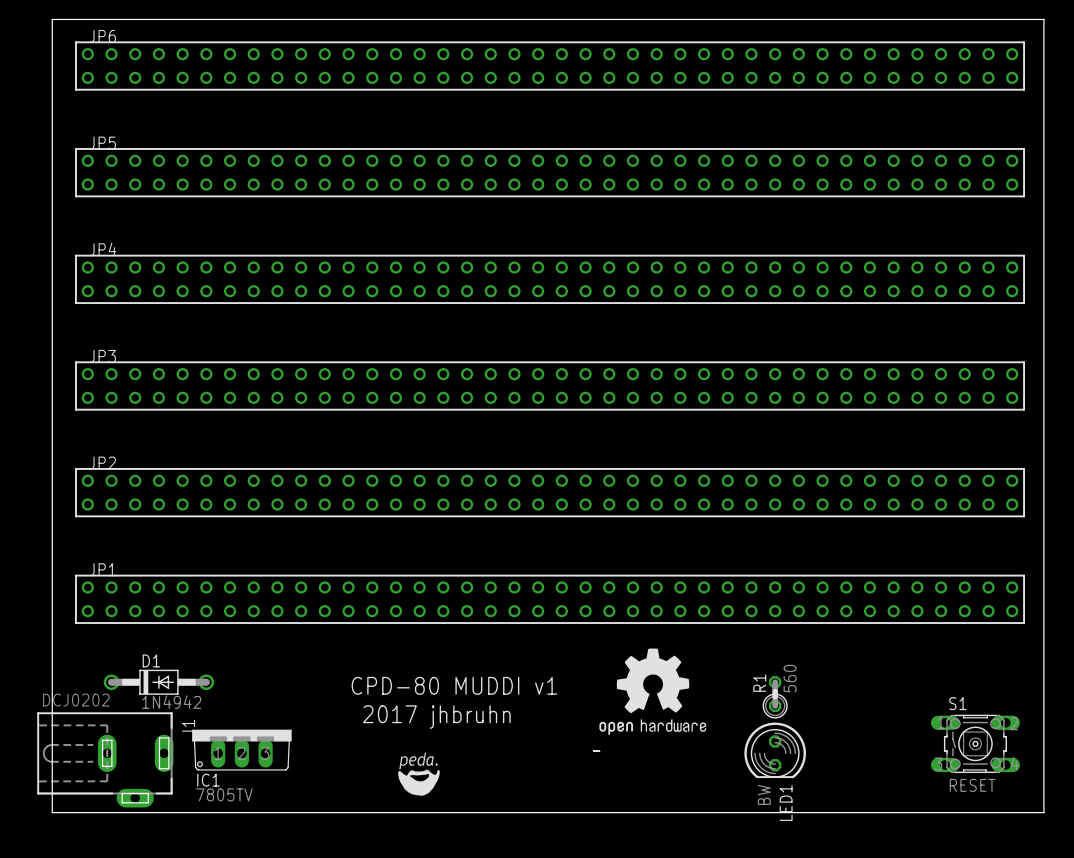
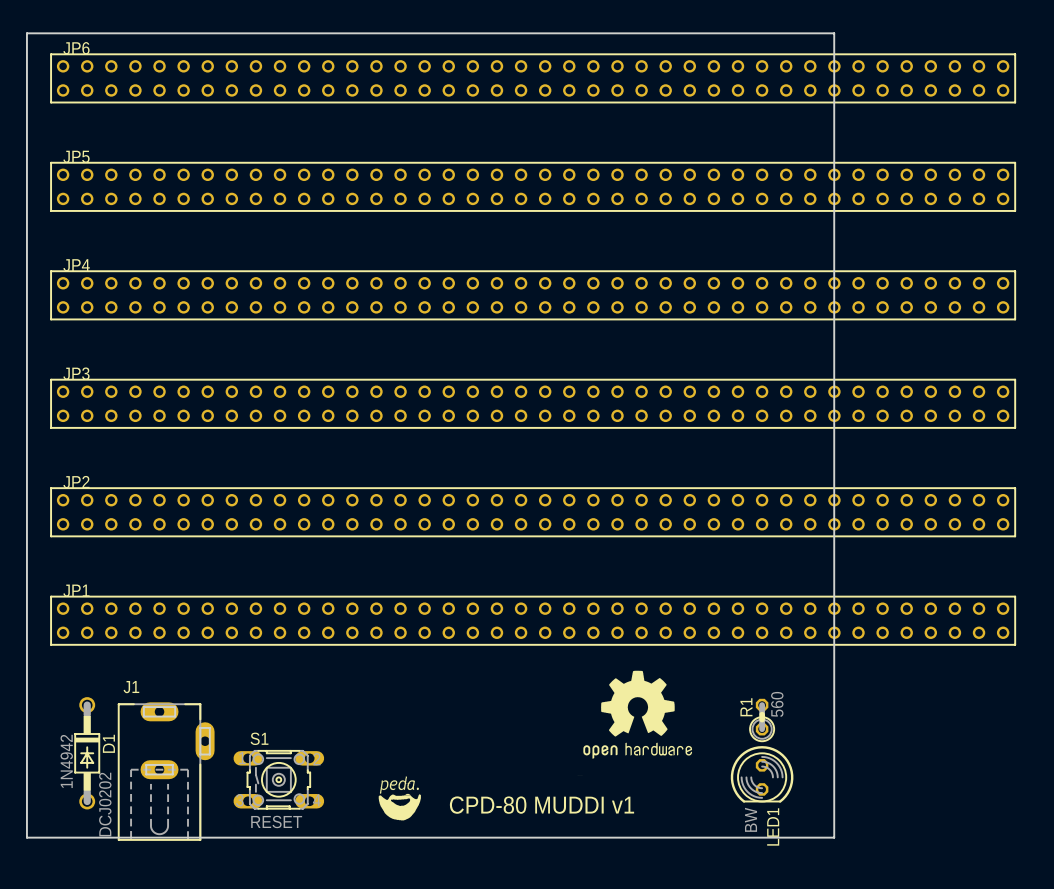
board edge: (52, 21) (52, 19) (1043, 19) (1043, 812) (846, 812) -> (26, 33) (834, 33) (834, 837)
D1 rotation: 0° (158, 682) -> 90° clockwise (87, 753)
D1 position: (158, 682) -> (87, 753)
text position: CPD-80 MUDDI v1 (454, 685) -> CPD-80 MUDDI v1 (541, 805)
text: 2017 jhbruhn (436, 717) -> none
S1 position: (975, 743) -> (278, 779)
IC1: 7805TV (241, 750) -> none
J1 rotation: 0° (105, 759) -> 90° counterclockwise (166, 771)
J1 position: (105, 759) -> (166, 771)

